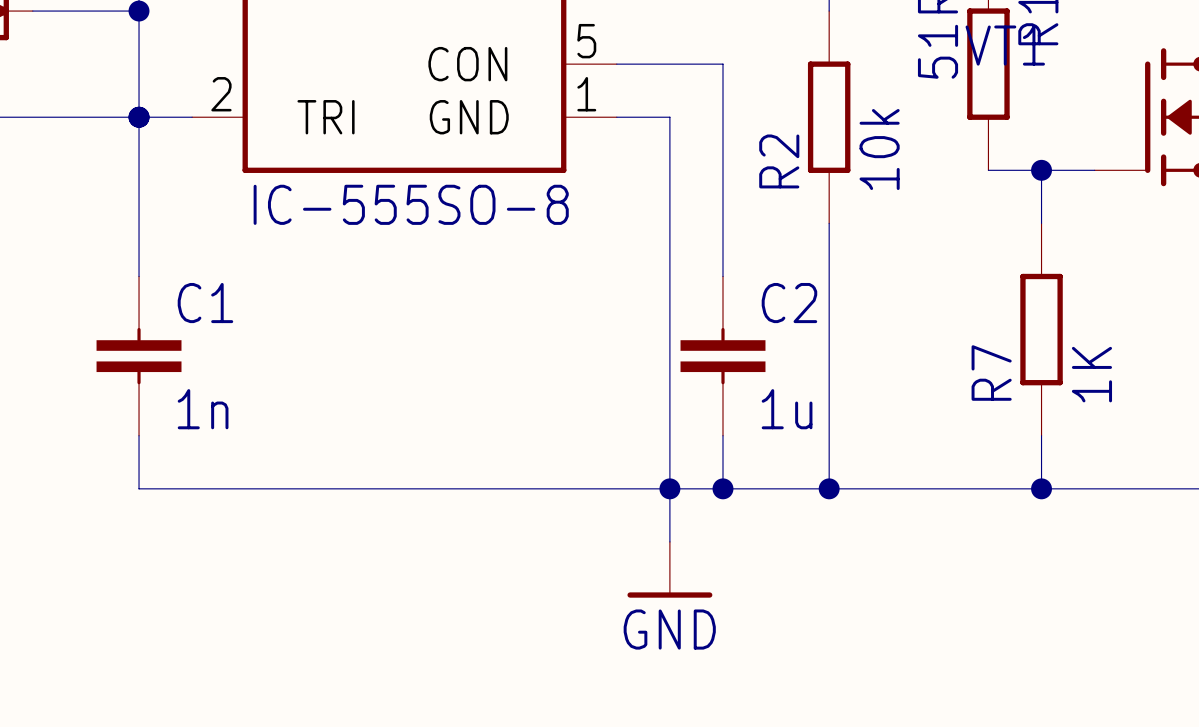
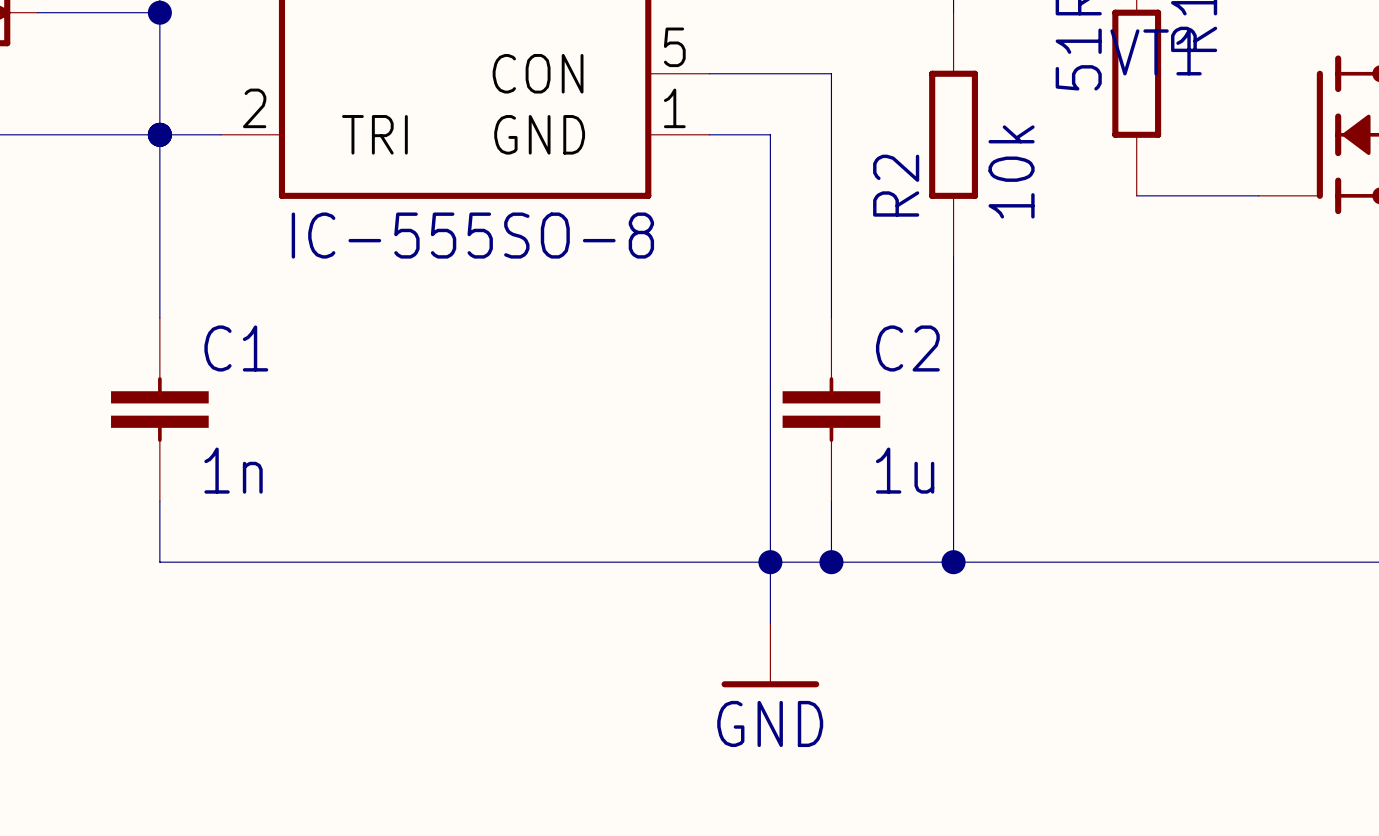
wire: (1041, 170) (1041, 223) -> none
junction: (1041, 170) -> none
R7: 1K (1041, 329) -> none
wire: (1041, 435) (1041, 488) -> none
junction: (1041, 488) -> none

